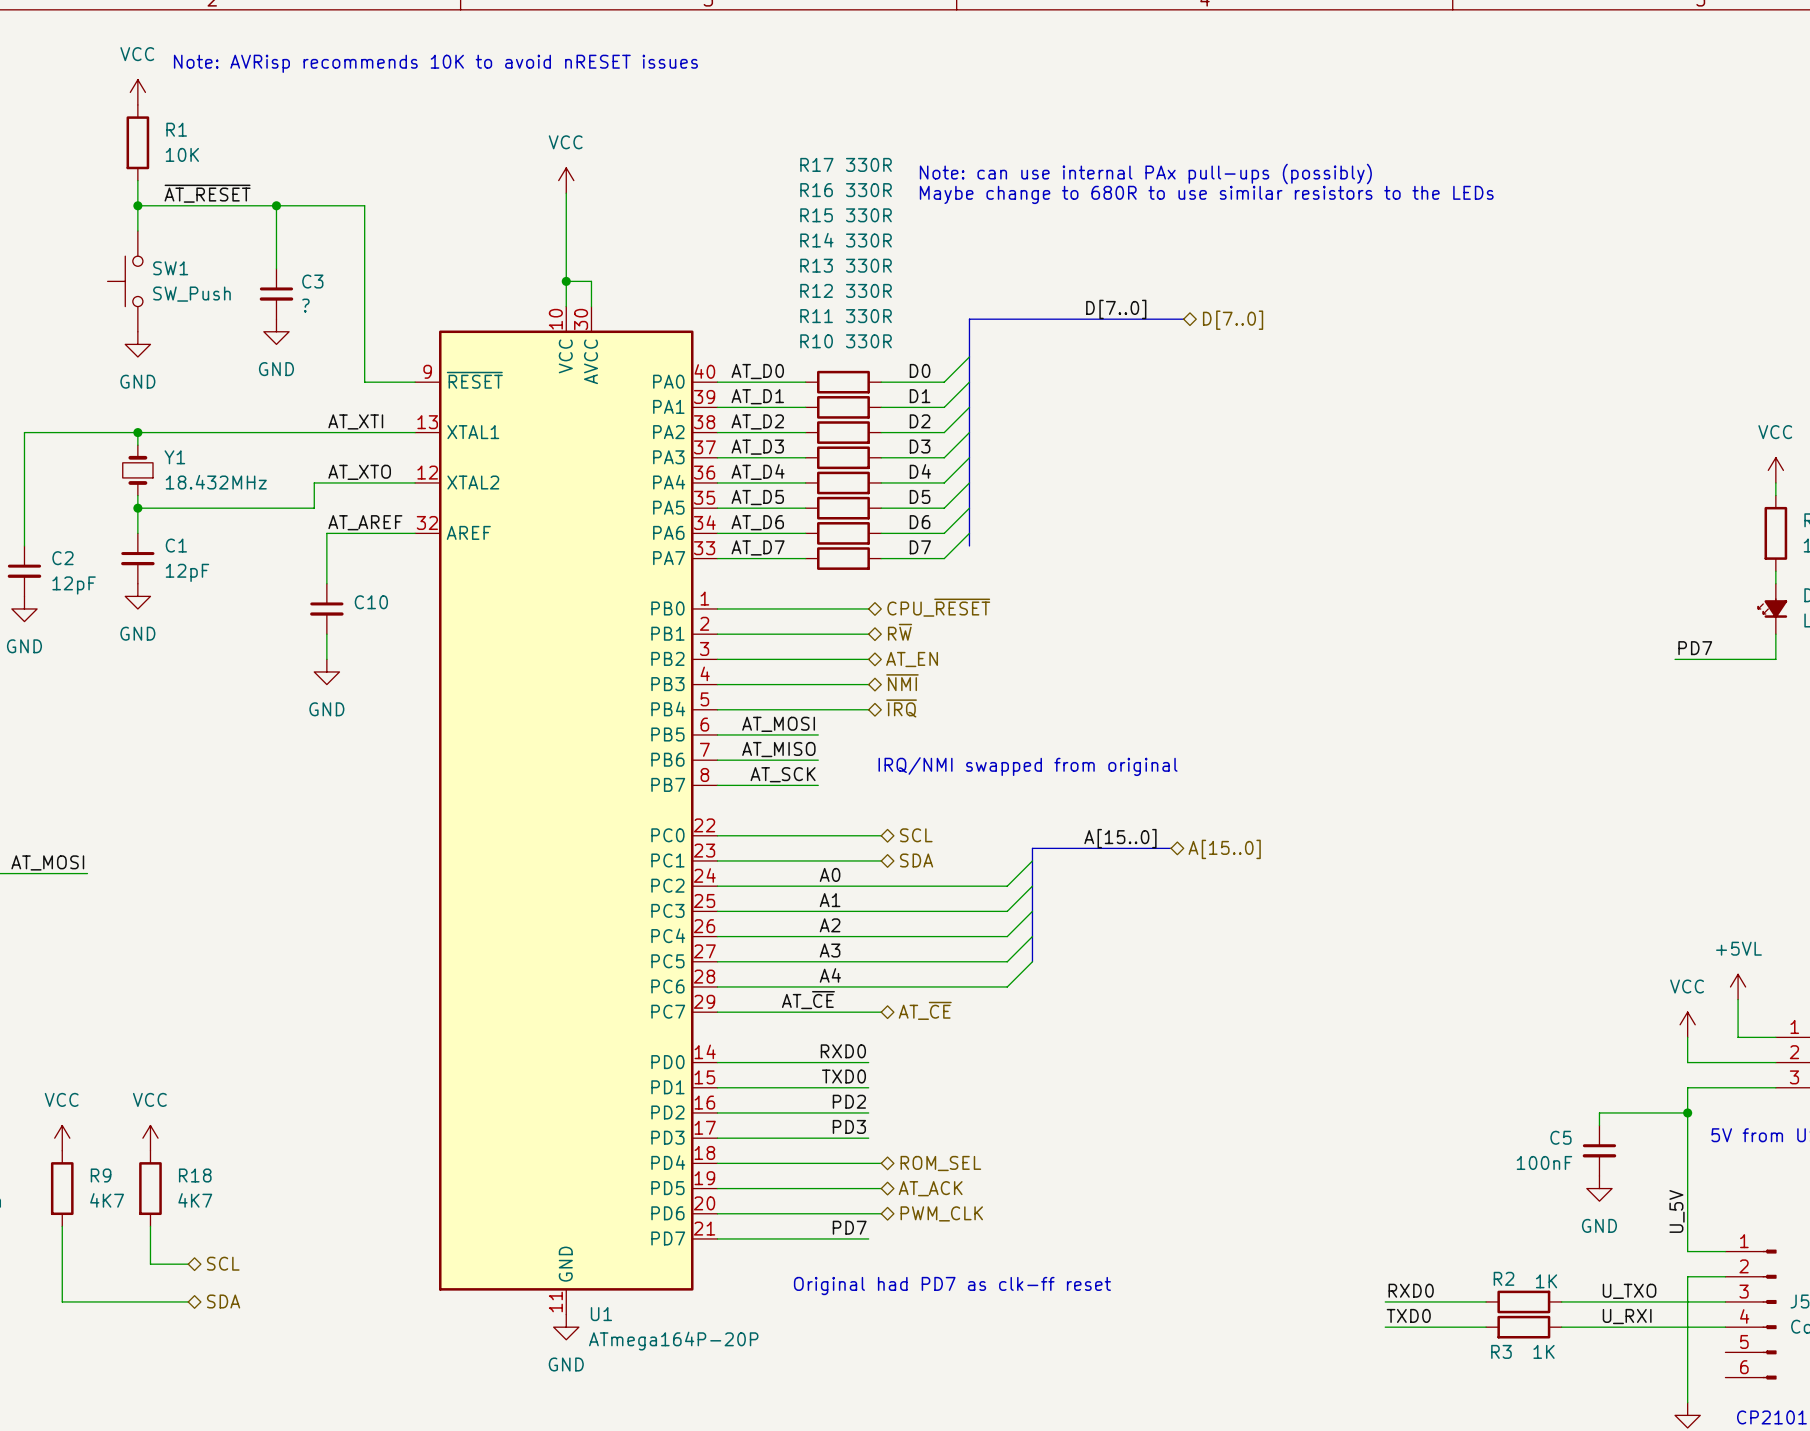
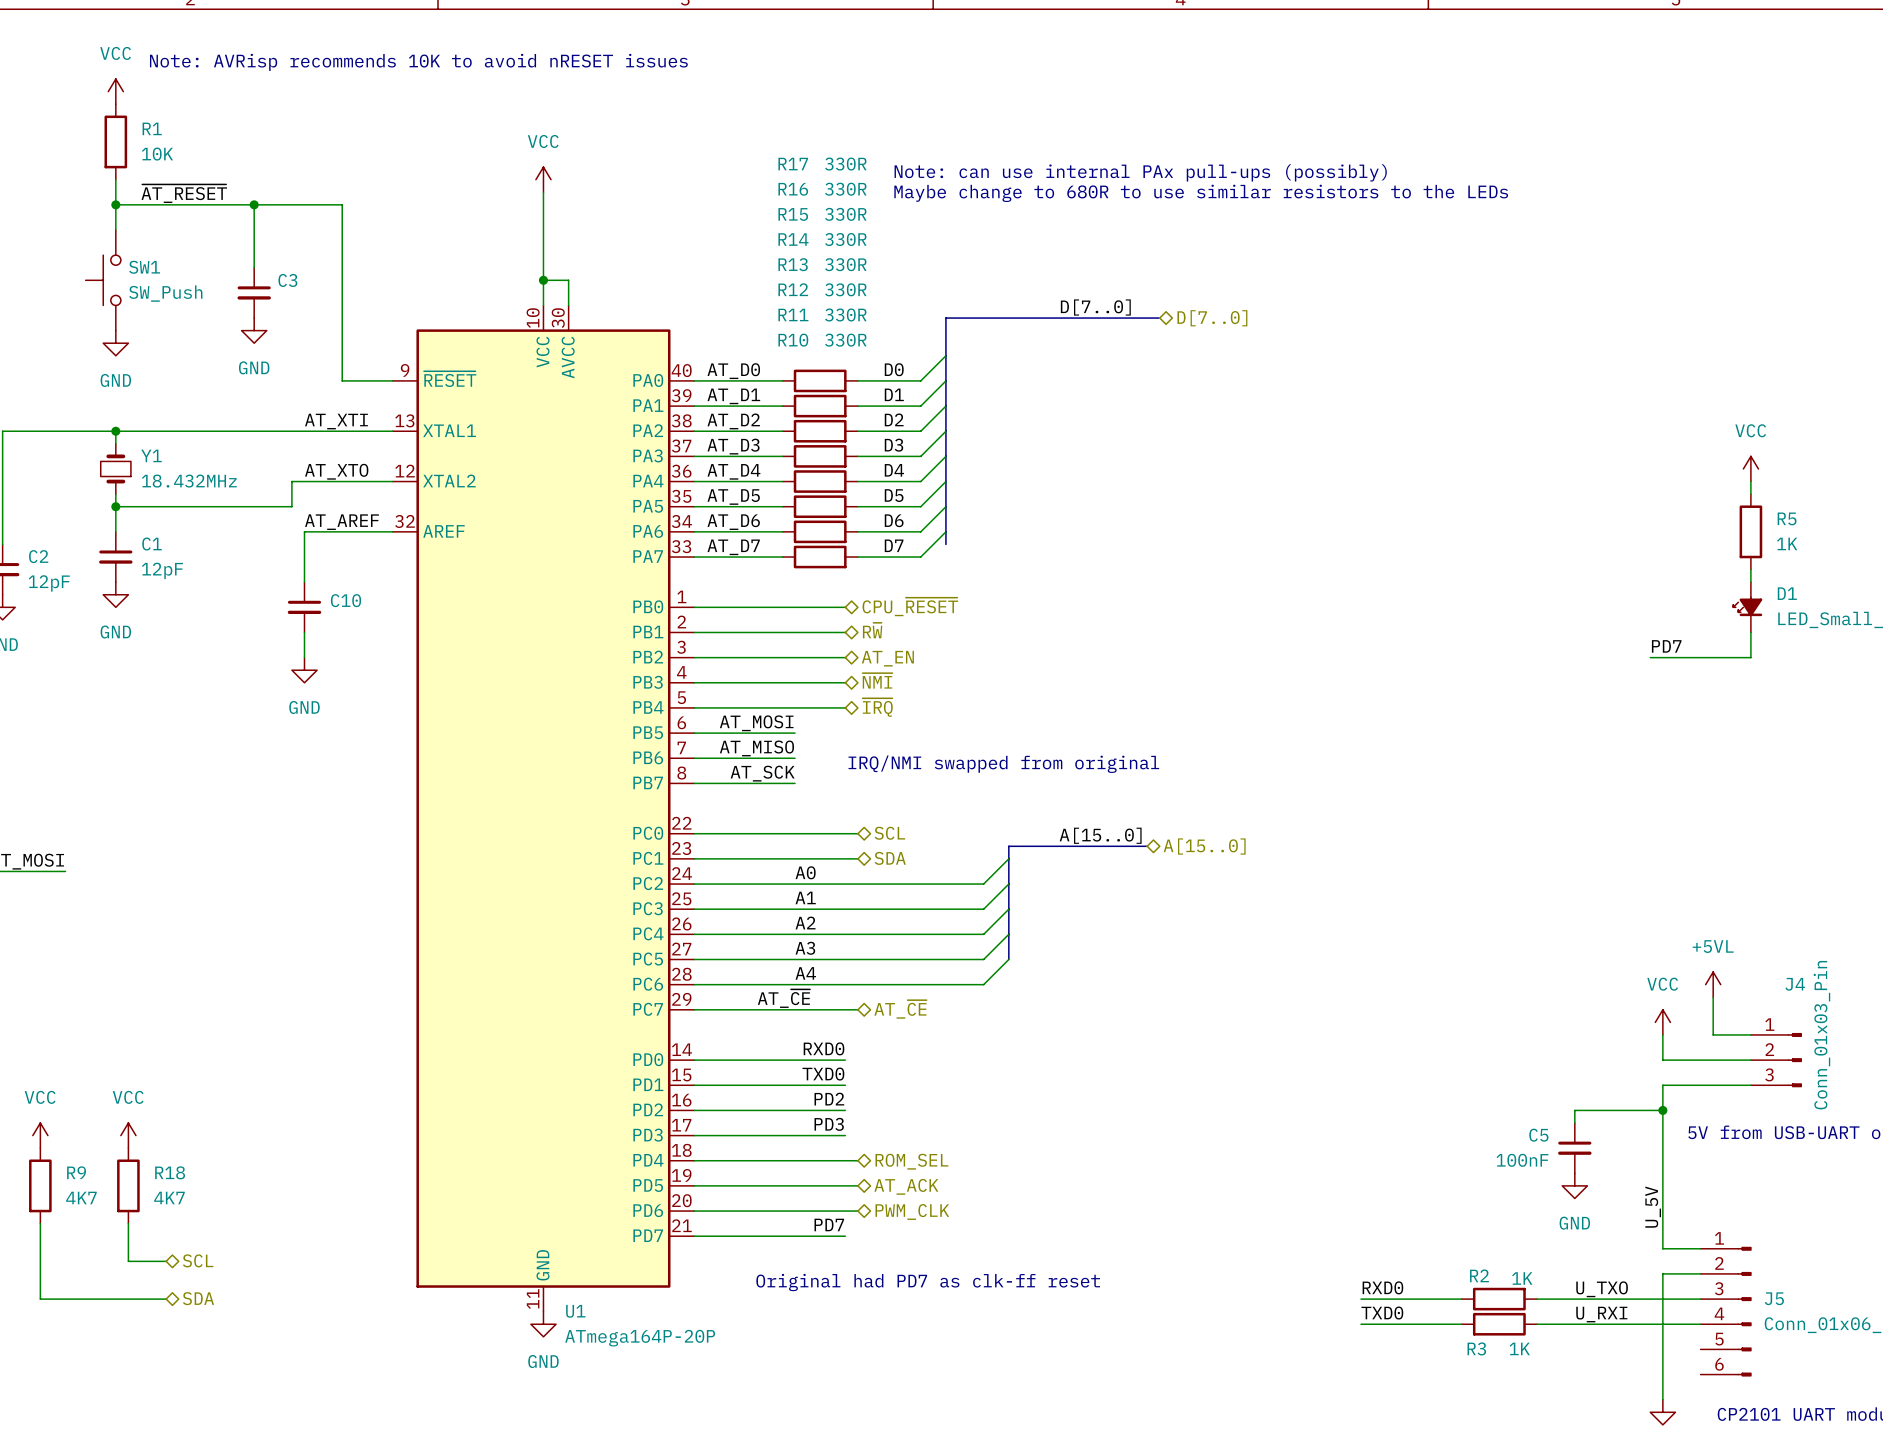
C3 value: ? (305, 305) -> none

